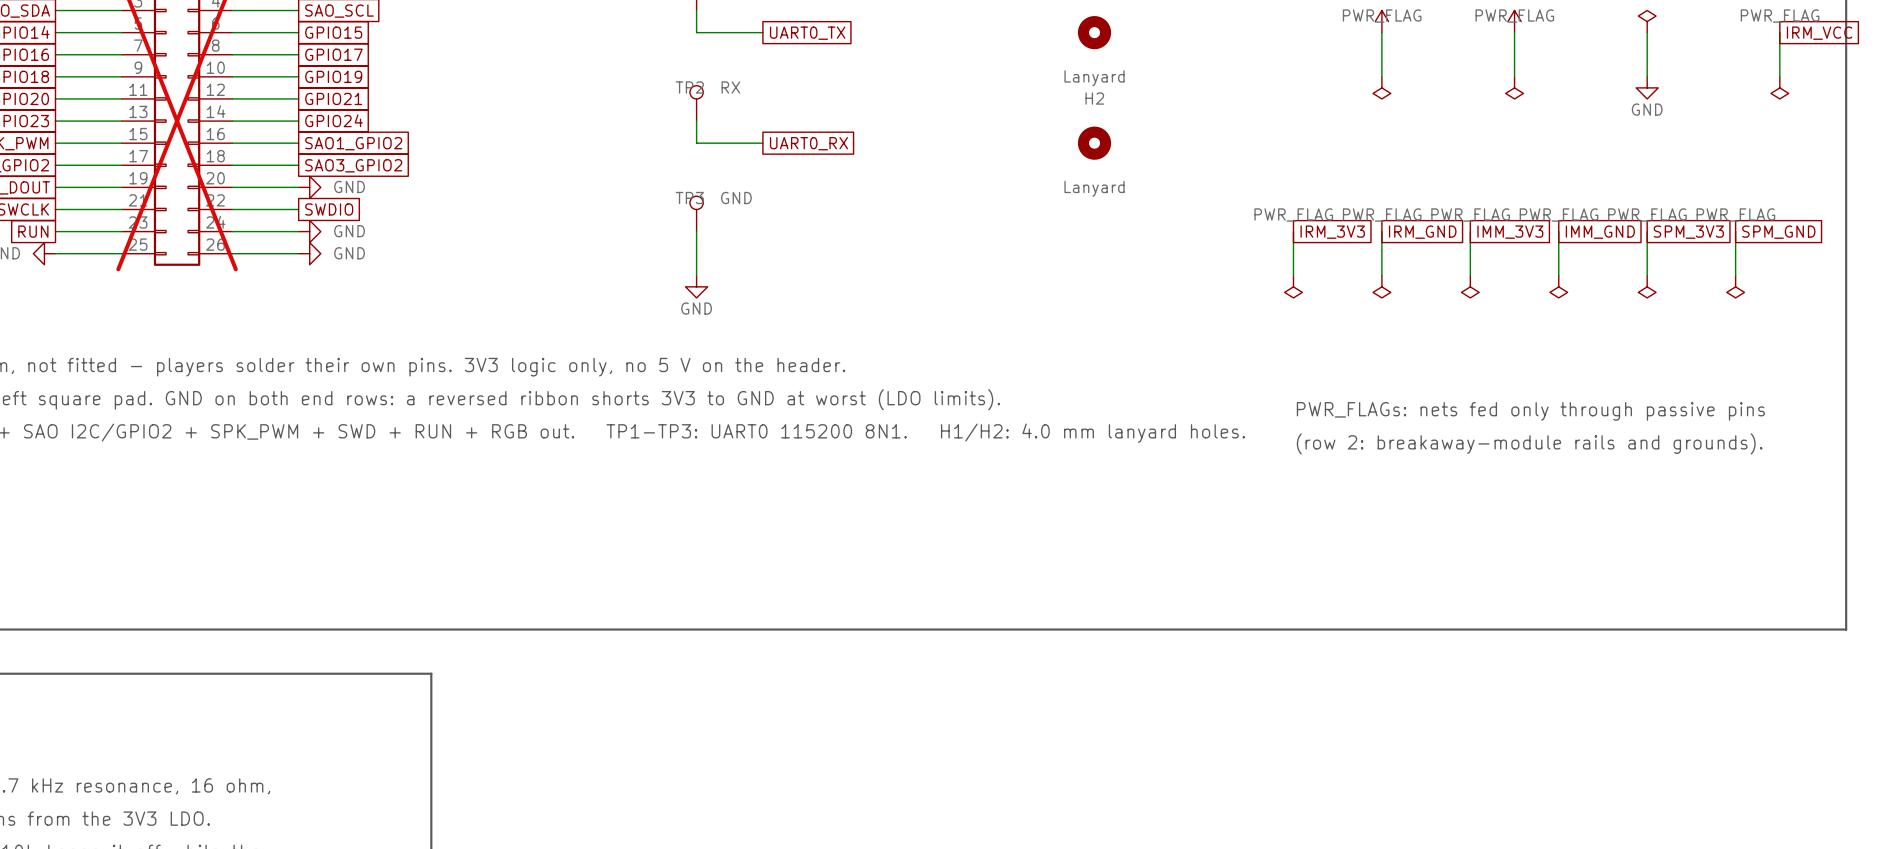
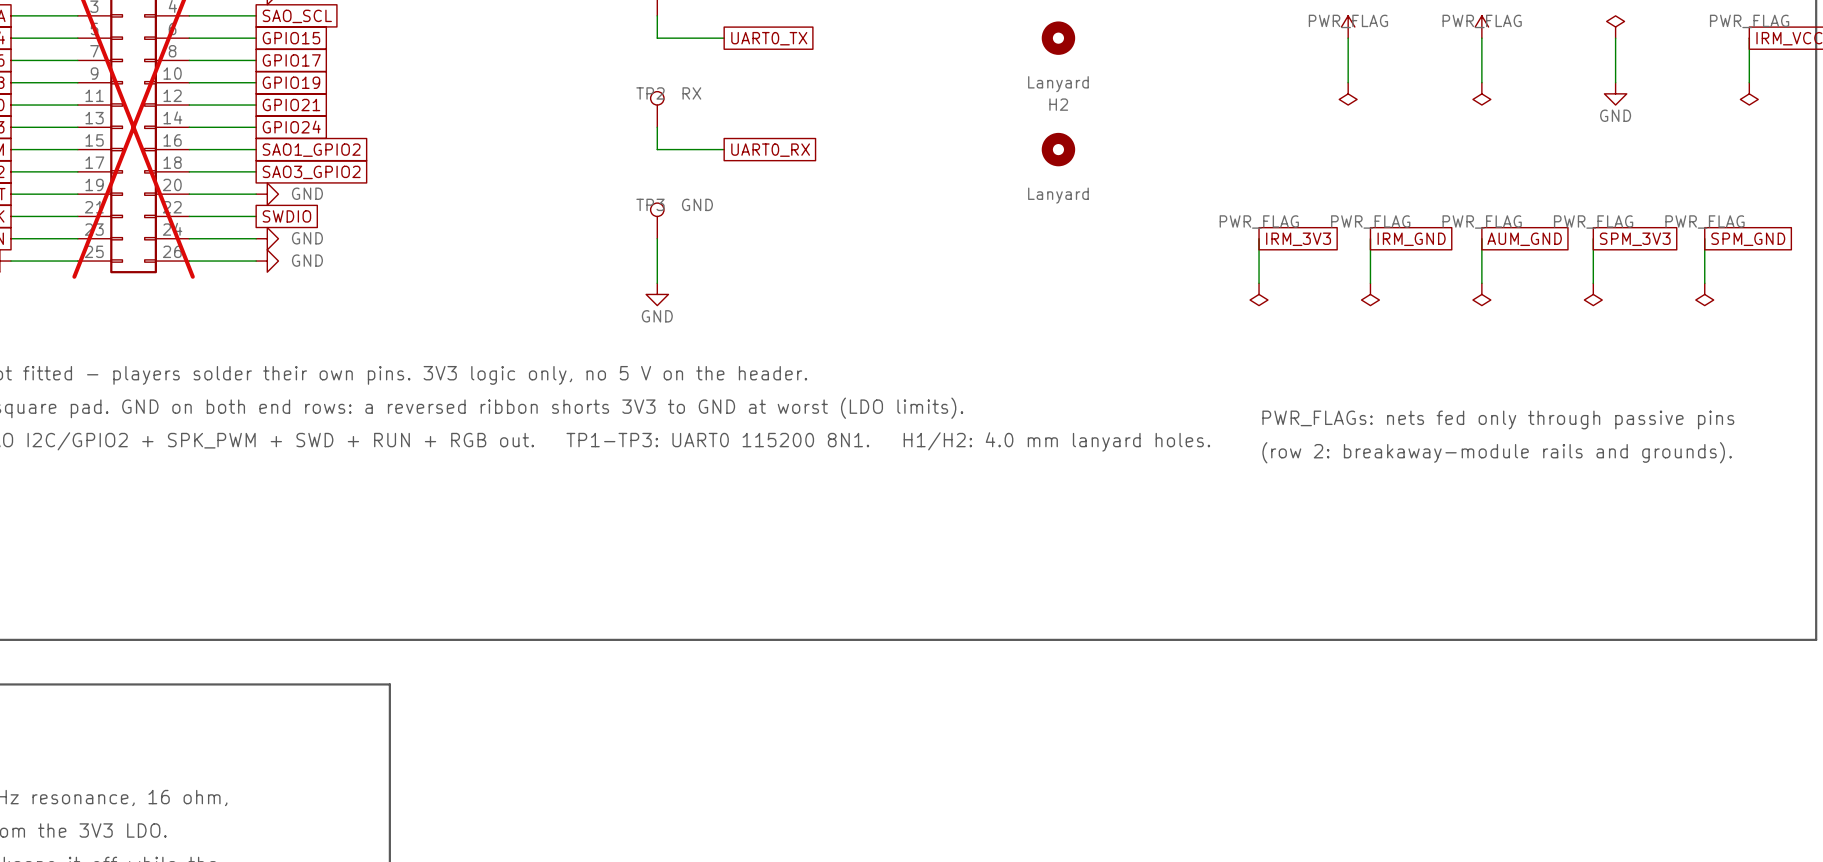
wire: (1381, 231) (1381, 275) -> (1370, 238) (1370, 283)
wire: (1470, 231) (1470, 275) -> (1481, 238) (1481, 283)
wire: (1558, 231) (1558, 275) -> none
wire: (1647, 231) (1647, 275) -> (1593, 238) (1593, 283)
global label position: IRM_GND (1422, 232) -> IRM_GND (1411, 239)
global label: IMM_3V3 (1510, 232) -> none
global label: IMM_GND (1600, 232) -> AUM_GND (1524, 239)
global label position: SPM_3V3 (1688, 232) -> SPM_3V3 (1635, 239)
power symbol position: PWR_FLAG (1381, 286) -> PWR_FLAG (1370, 294)
power symbol: PWR_FLAG (1470, 286) -> none
power symbol: none -> PWR_FLAG (1481, 294)
power symbol: PWR_FLAG (1558, 286) -> none
power symbol position: PWR_FLAG (1647, 286) -> PWR_FLAG (1593, 294)

